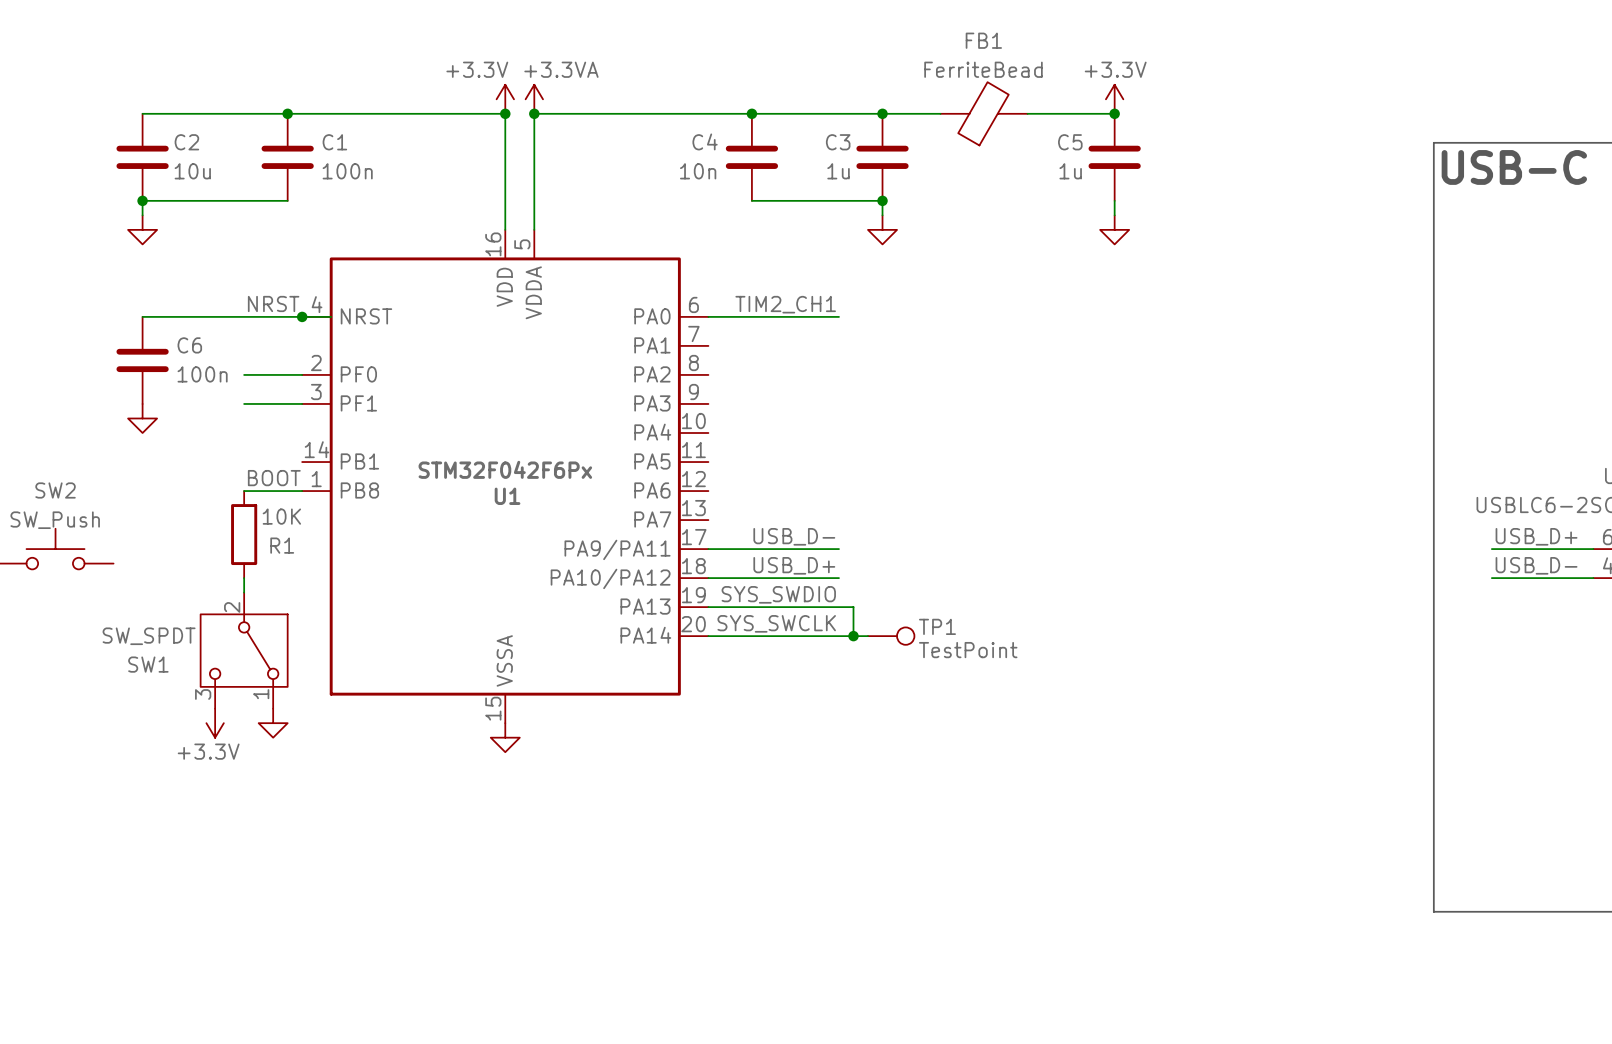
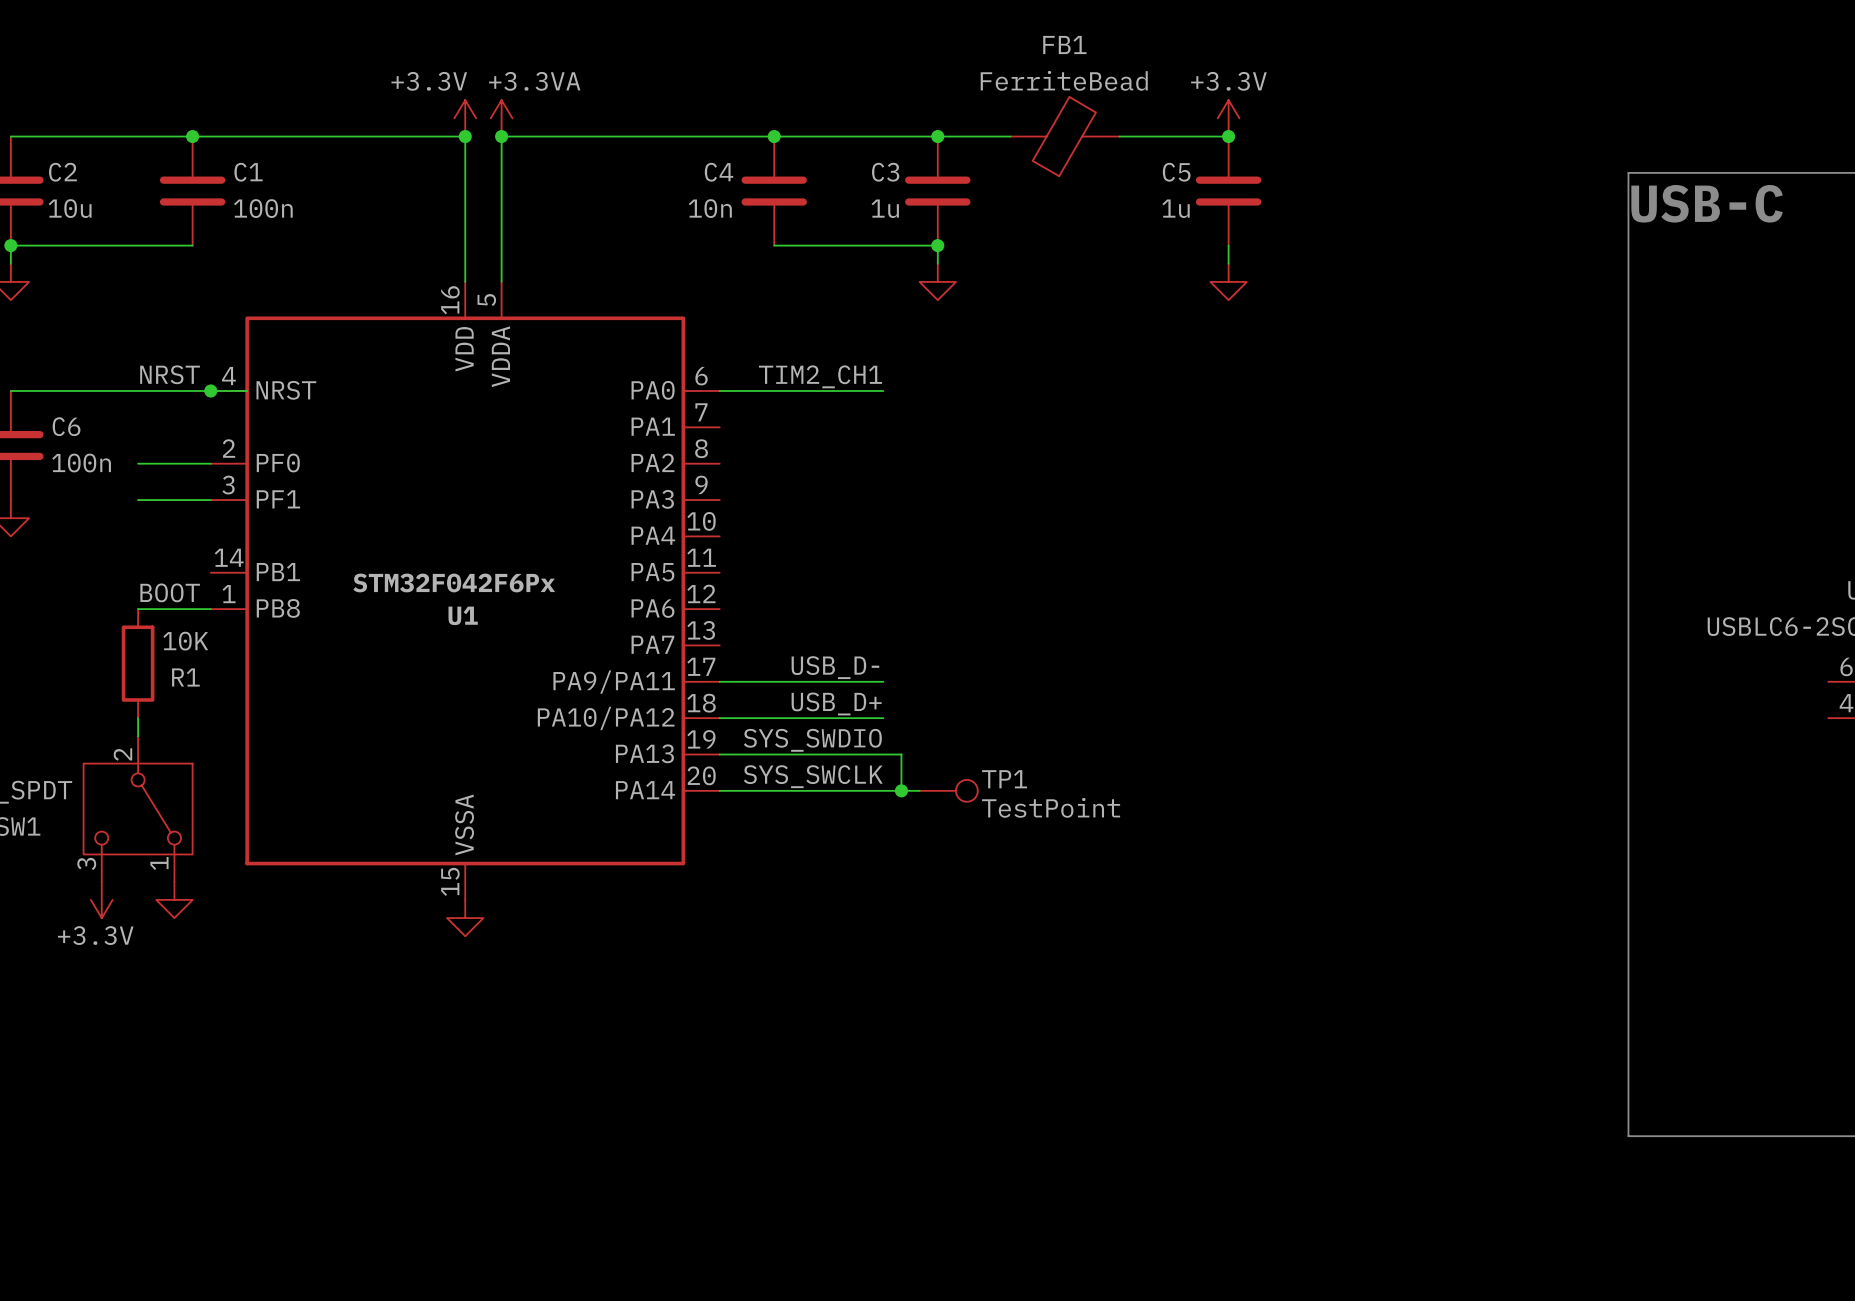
label: USB_D+ (1536, 536) -> none
wire: (1491, 549) (1593, 549) -> none
label: USB_D- (1536, 565) -> none
wire: (1491, 578) (1593, 578) -> none

